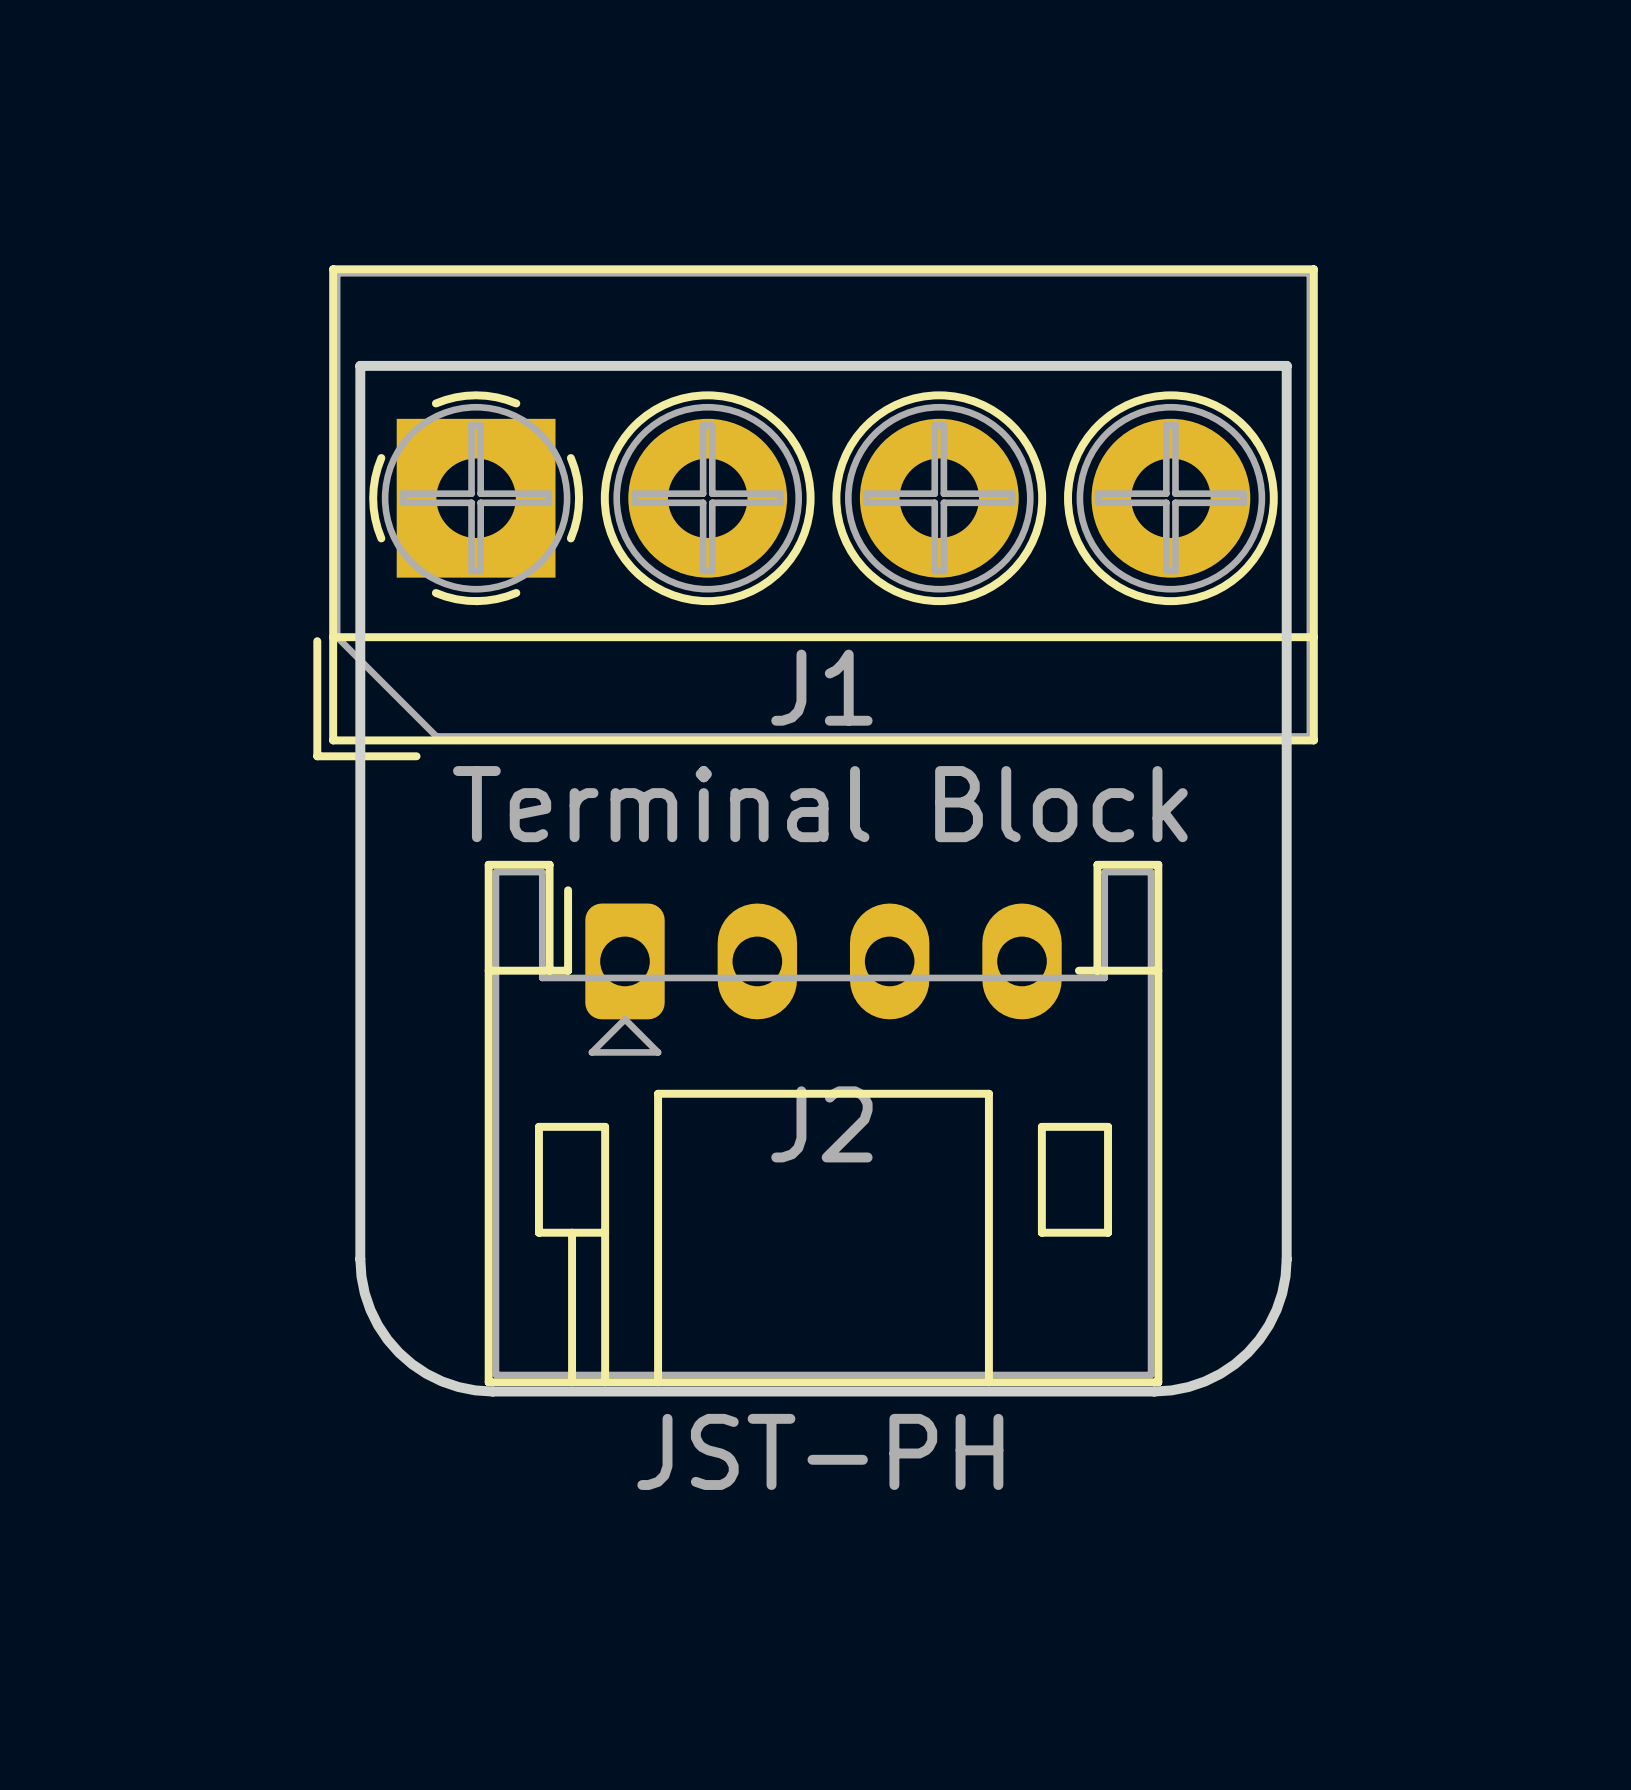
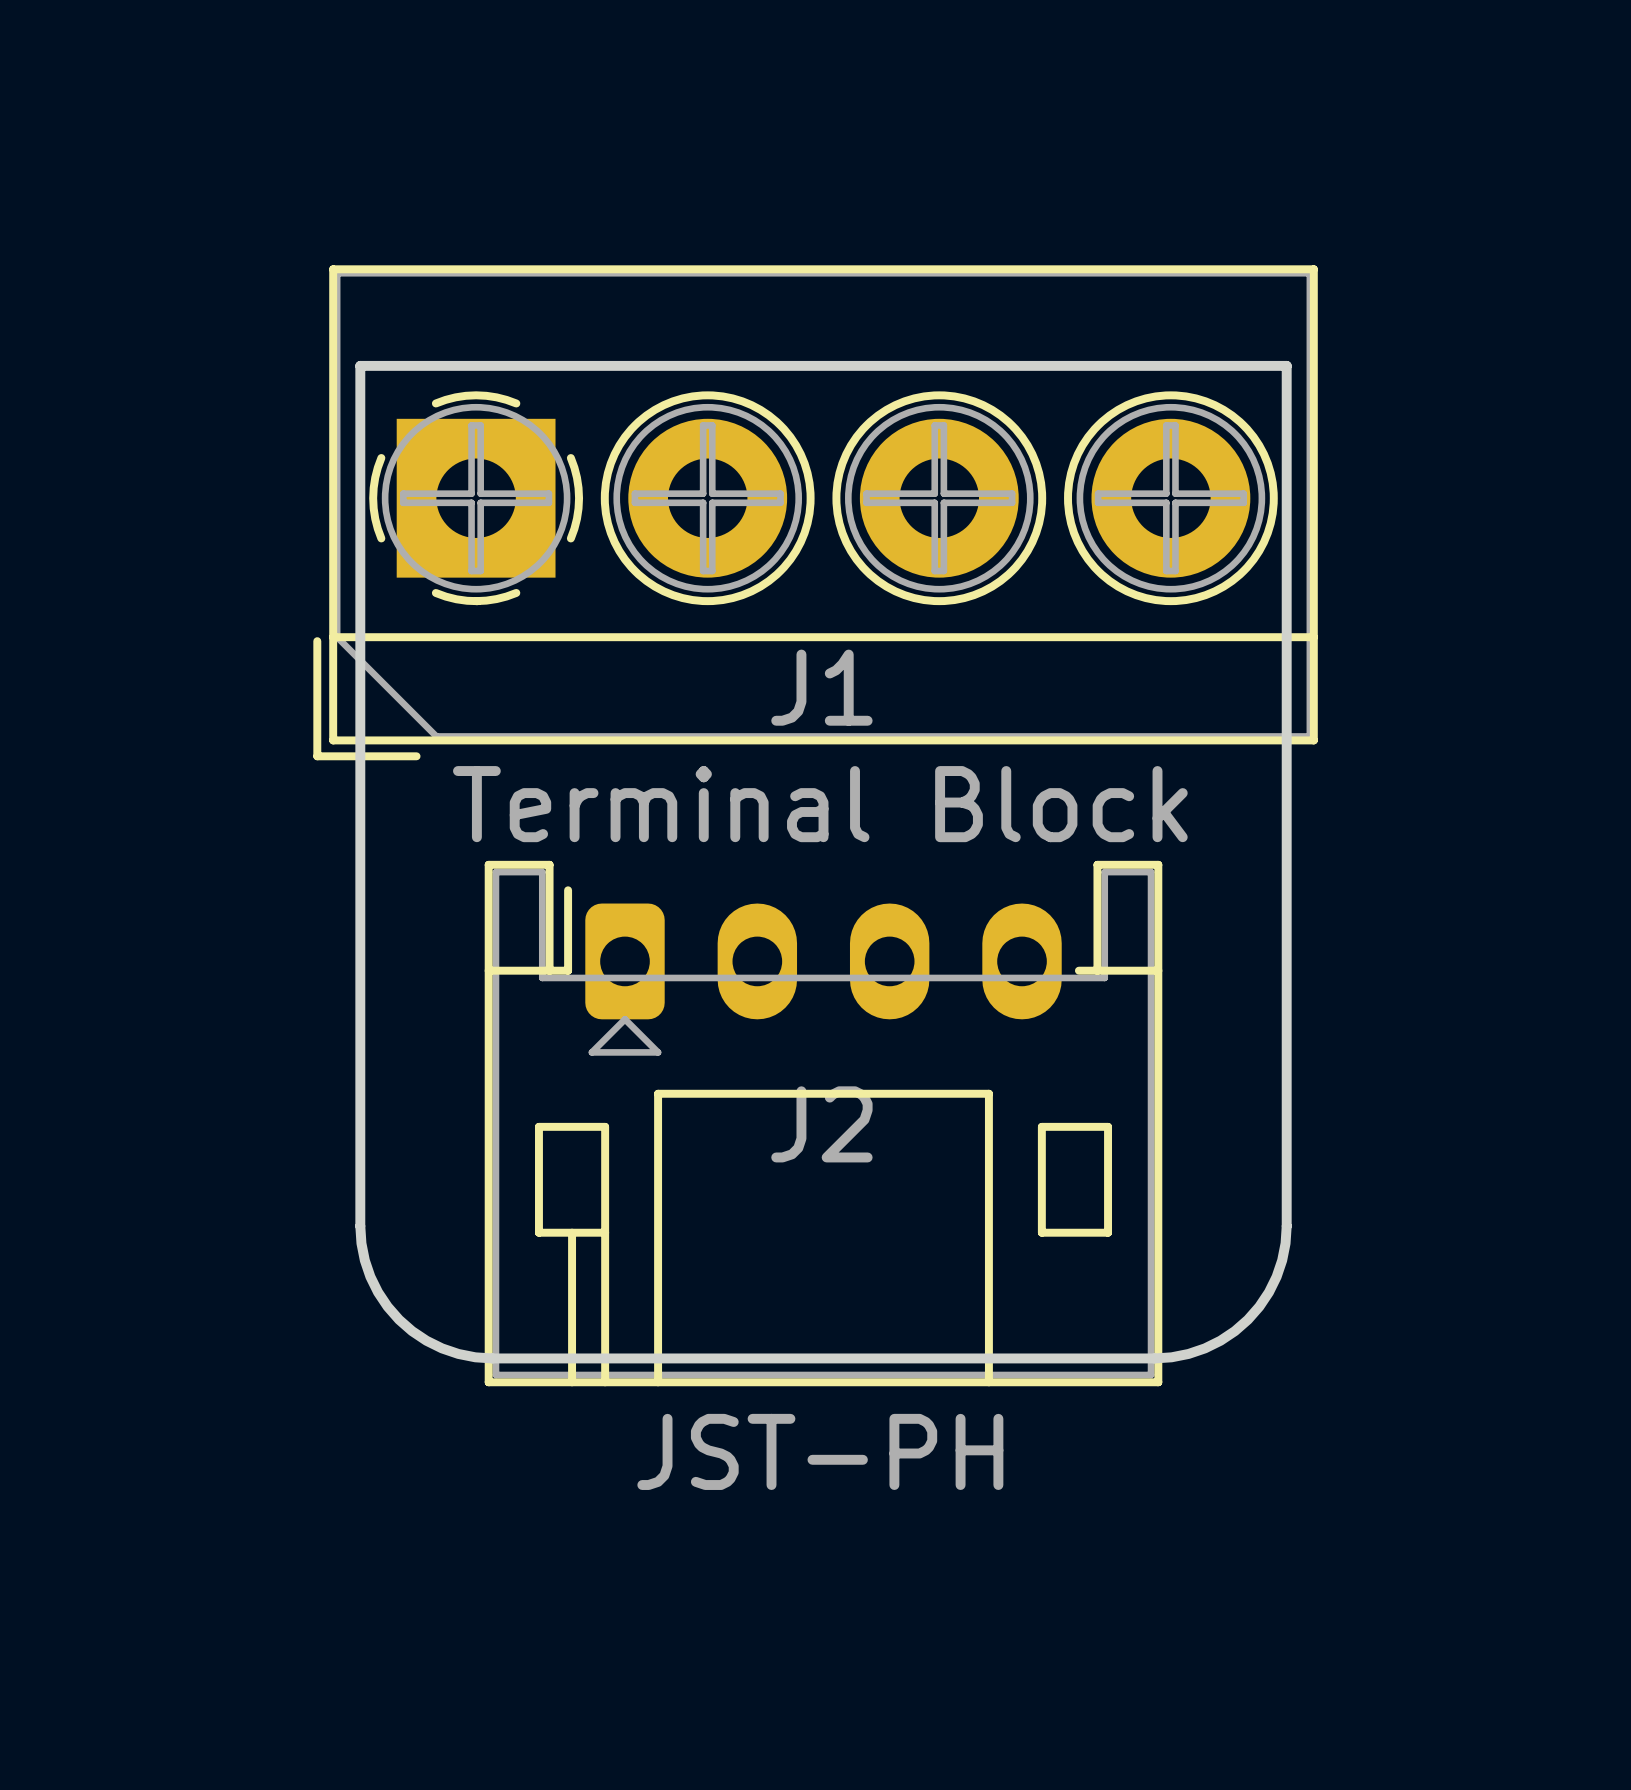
board edge: (360, 1226) (361, 1276) (364, 1293) (370, 1309) (387, 1339) (399, 1352) (426, 1373) (458, 1387) (492, 1391) (1154, 1391) (1188, 1387) (1220, 1373) (1234, 1364) (1247, 1352) (1268, 1325) (1276, 1309) (1285, 1276) (1286, 1226) -> (360, 1226) (361, 1243) (370, 1276) (387, 1306) (399, 1319) (426, 1340) (442, 1348) (458, 1353) (492, 1358) (1171, 1357) (1188, 1353) (1220, 1340) (1247, 1319) (1259, 1306) (1276, 1276) (1285, 1243) (1286, 1226)

